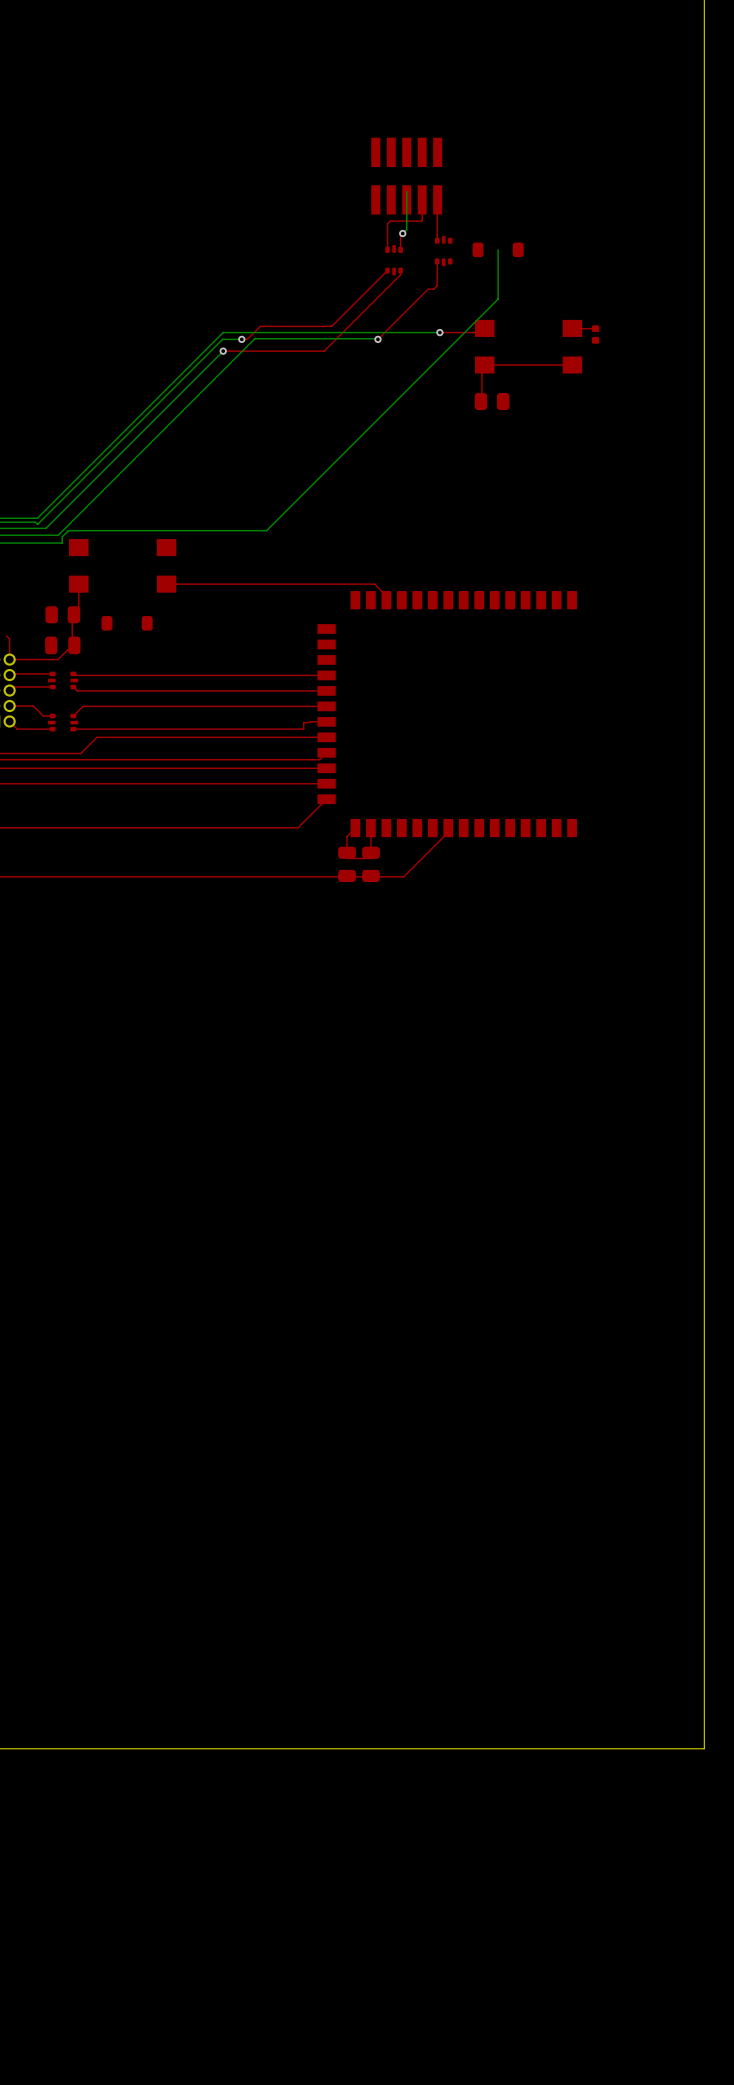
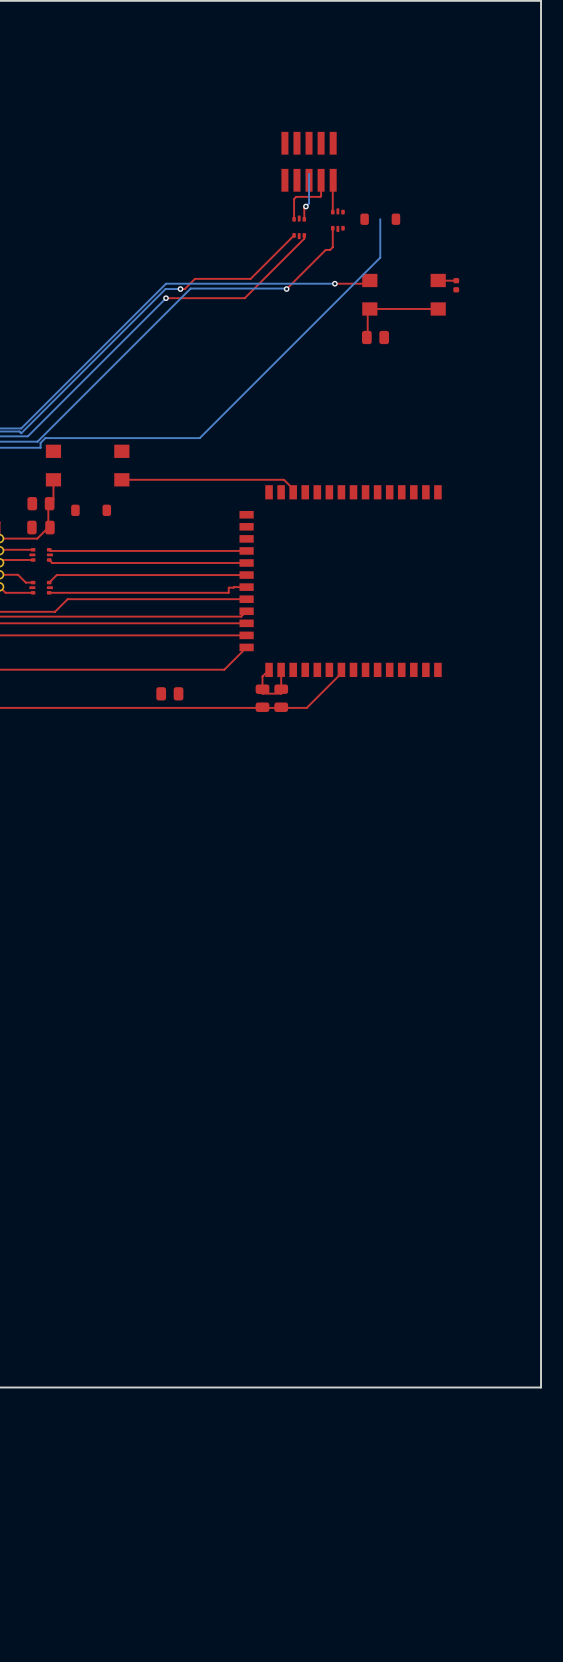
part: none -> (169, 693)

